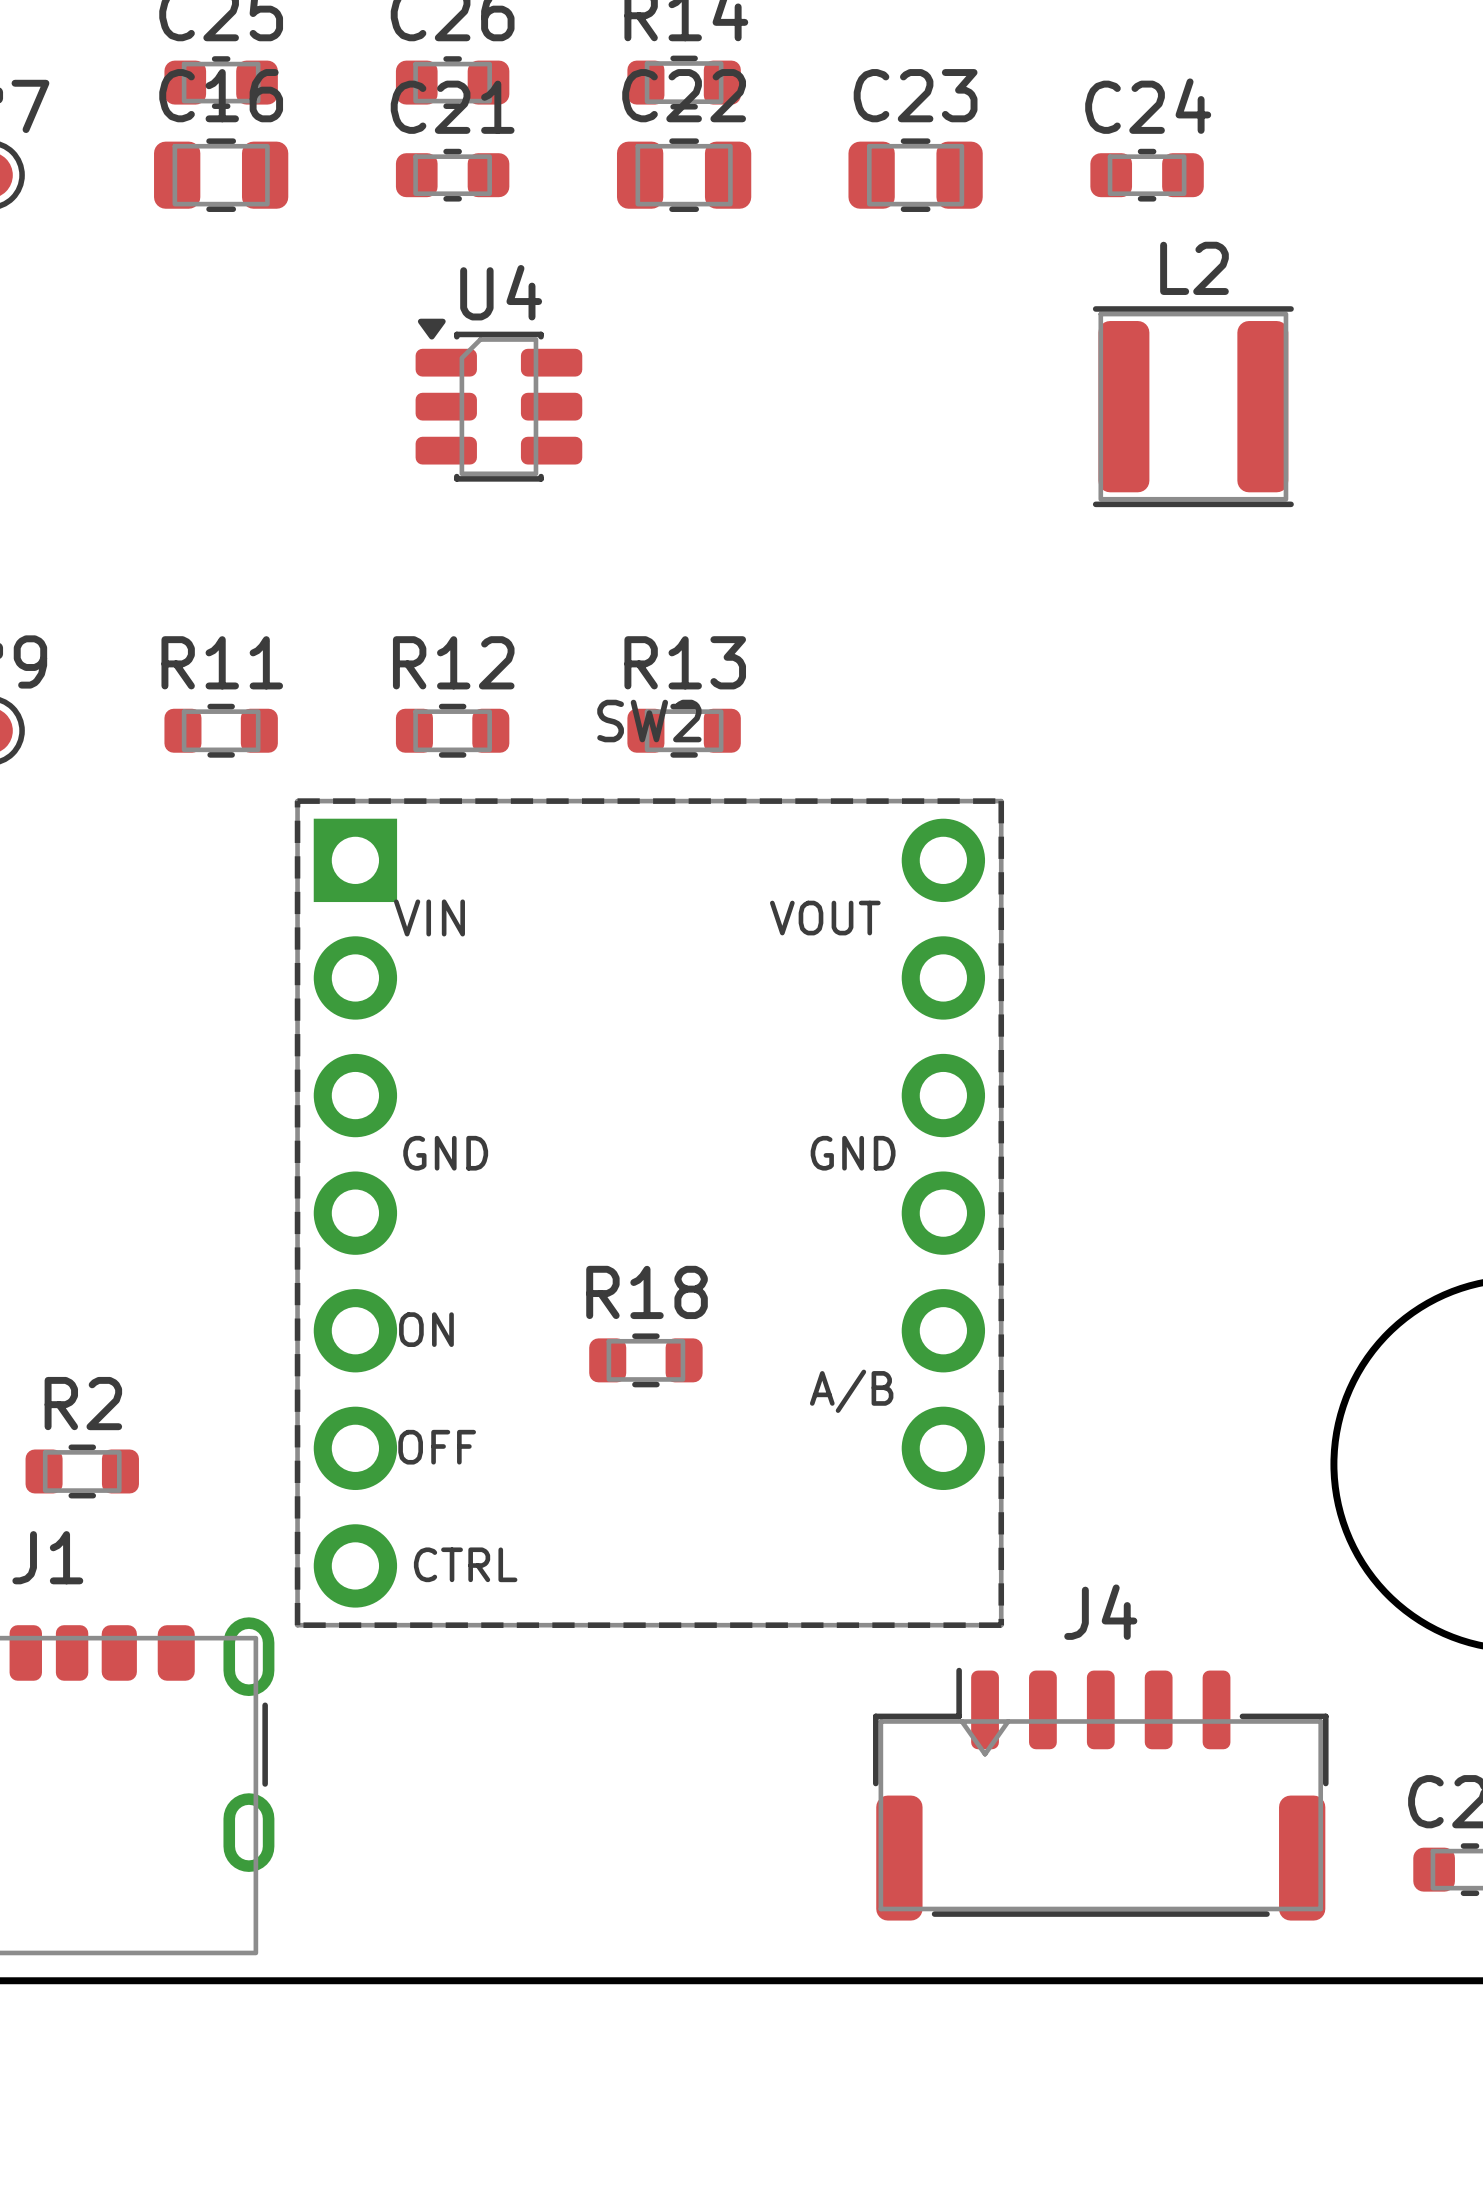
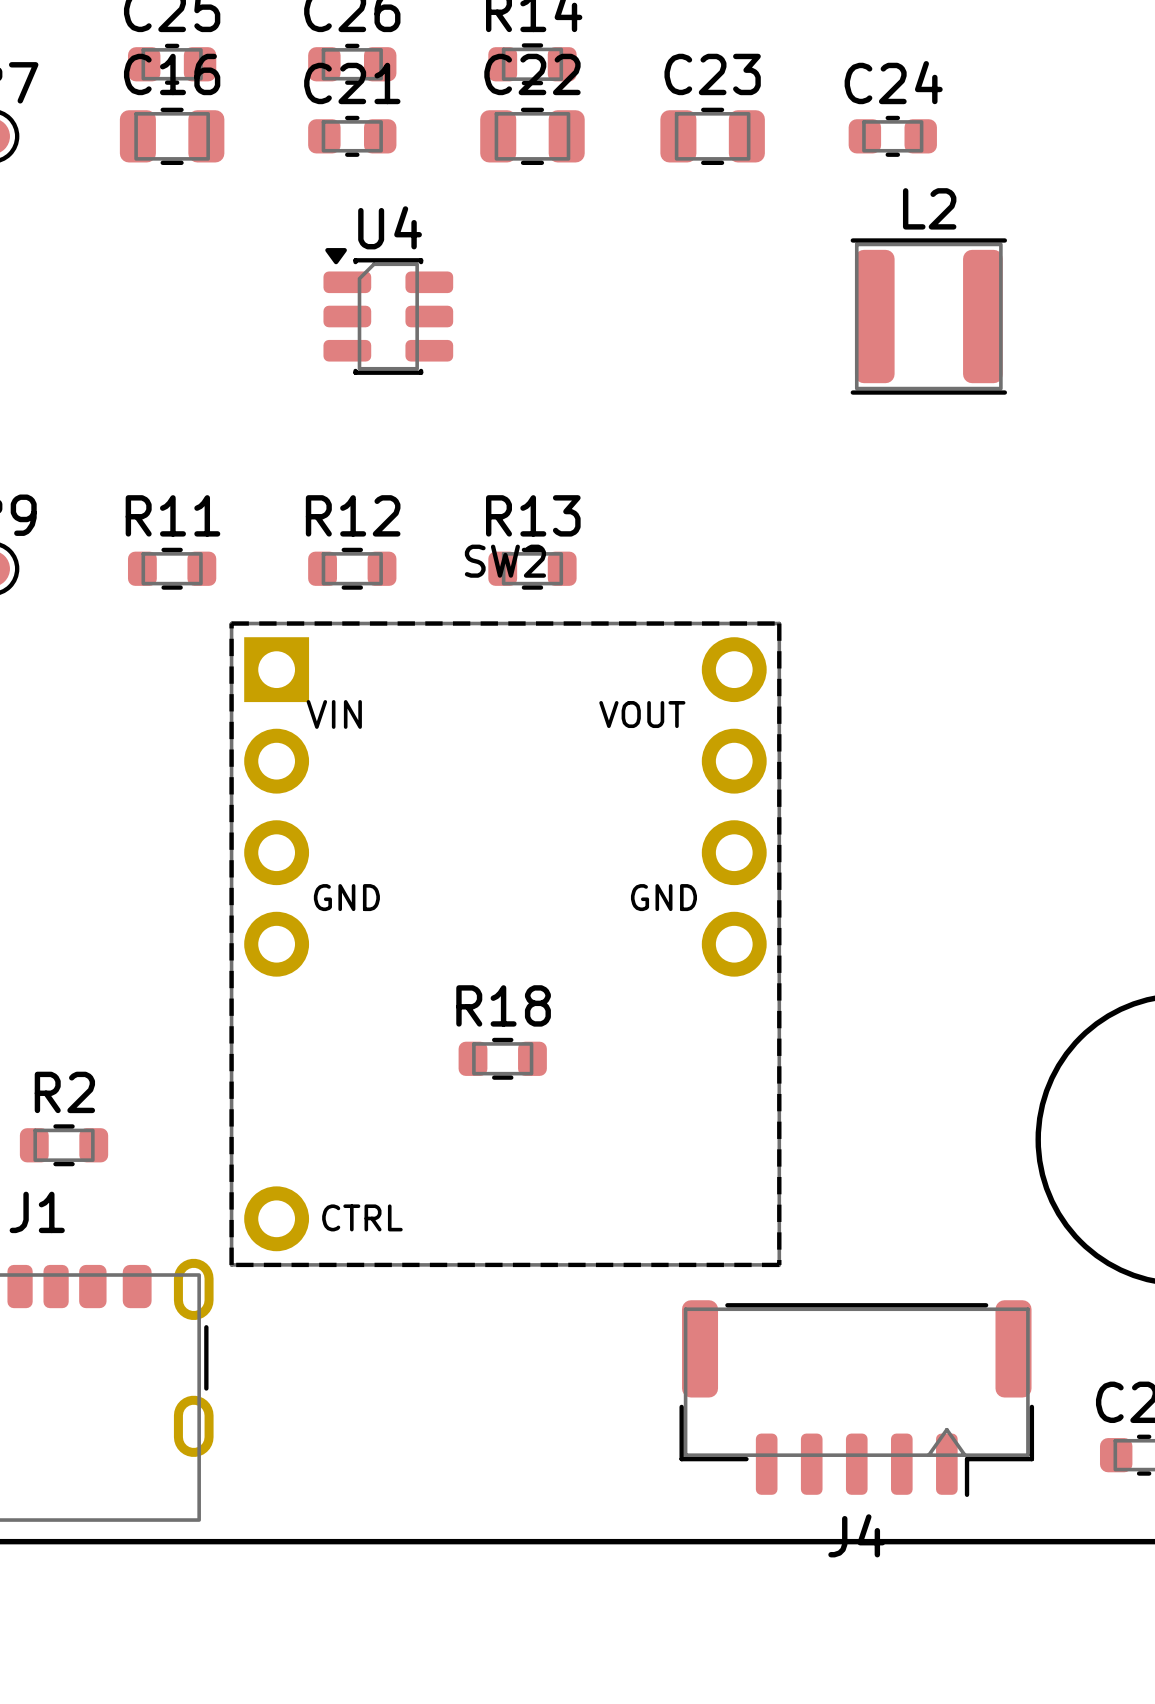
SW2 footprint: [294, 798, 1005, 1628] -> [229, 621, 782, 1268]
J4 rotation: 0° (1100, 1794) -> 180° (856, 1398)

